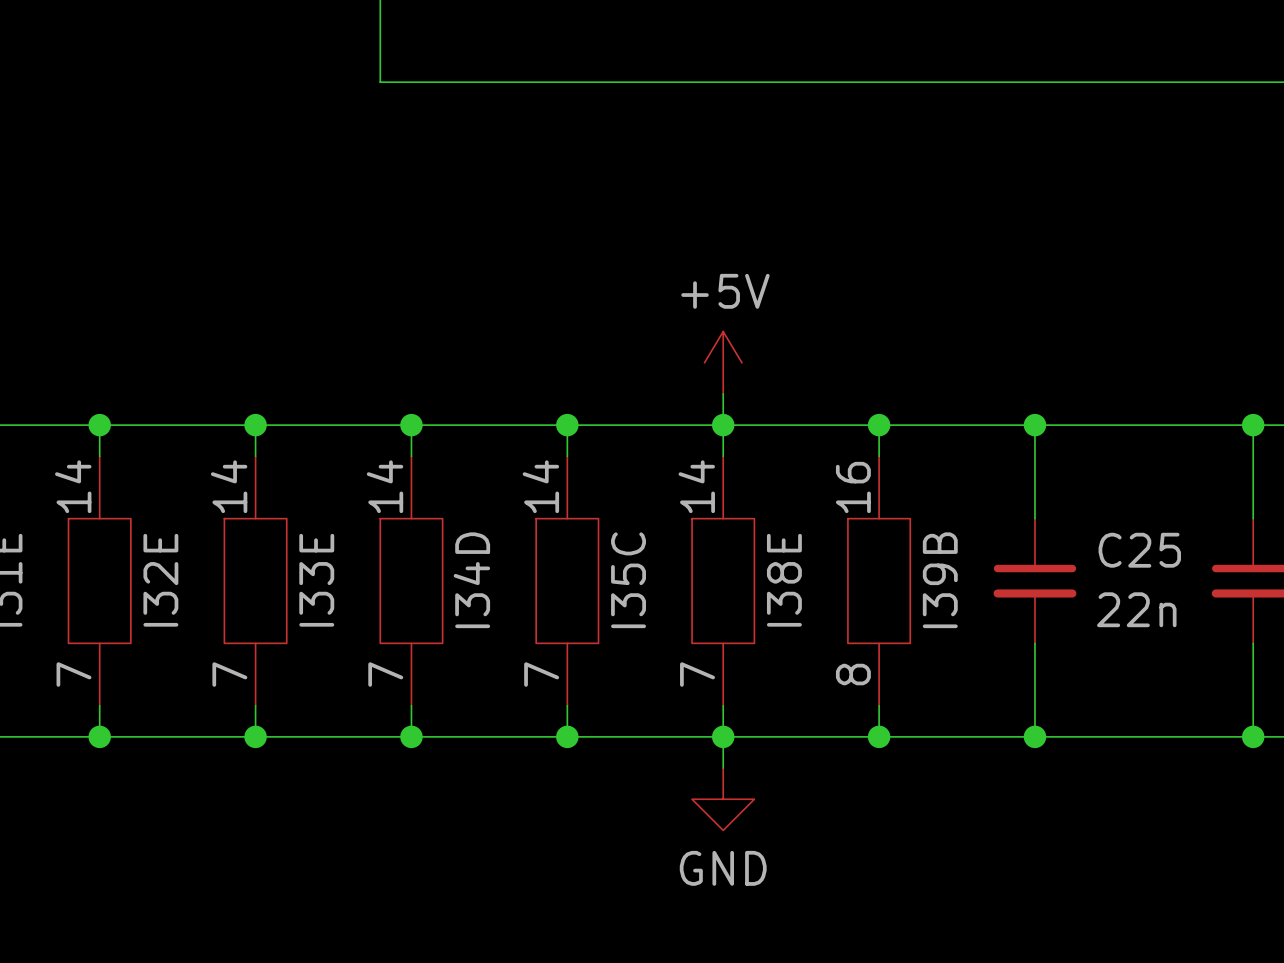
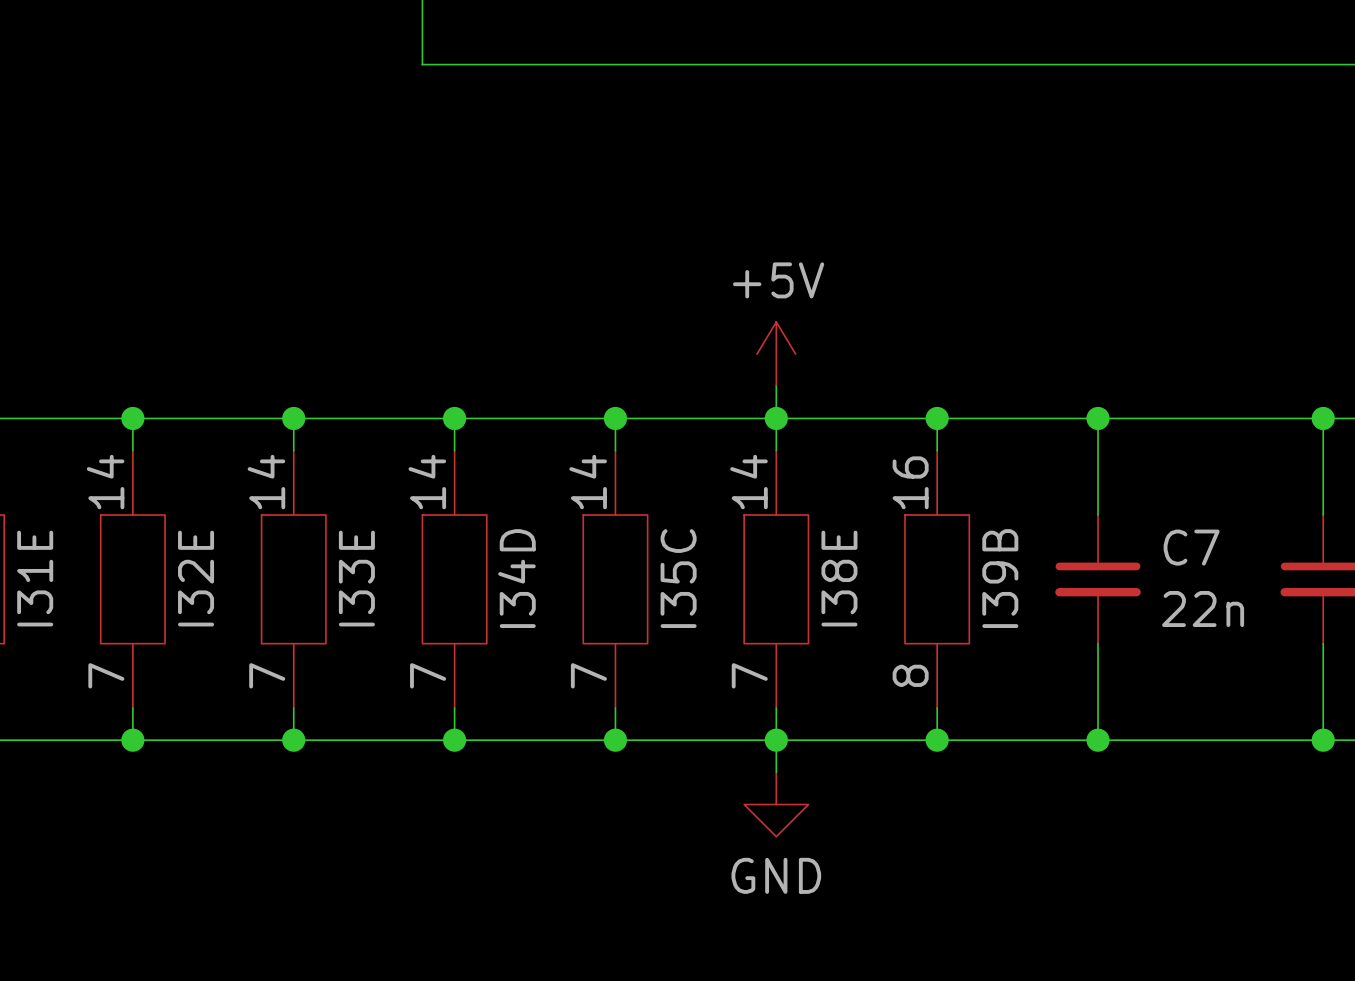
C25 name: C25 (1139, 550) -> C7 (1191, 547)

